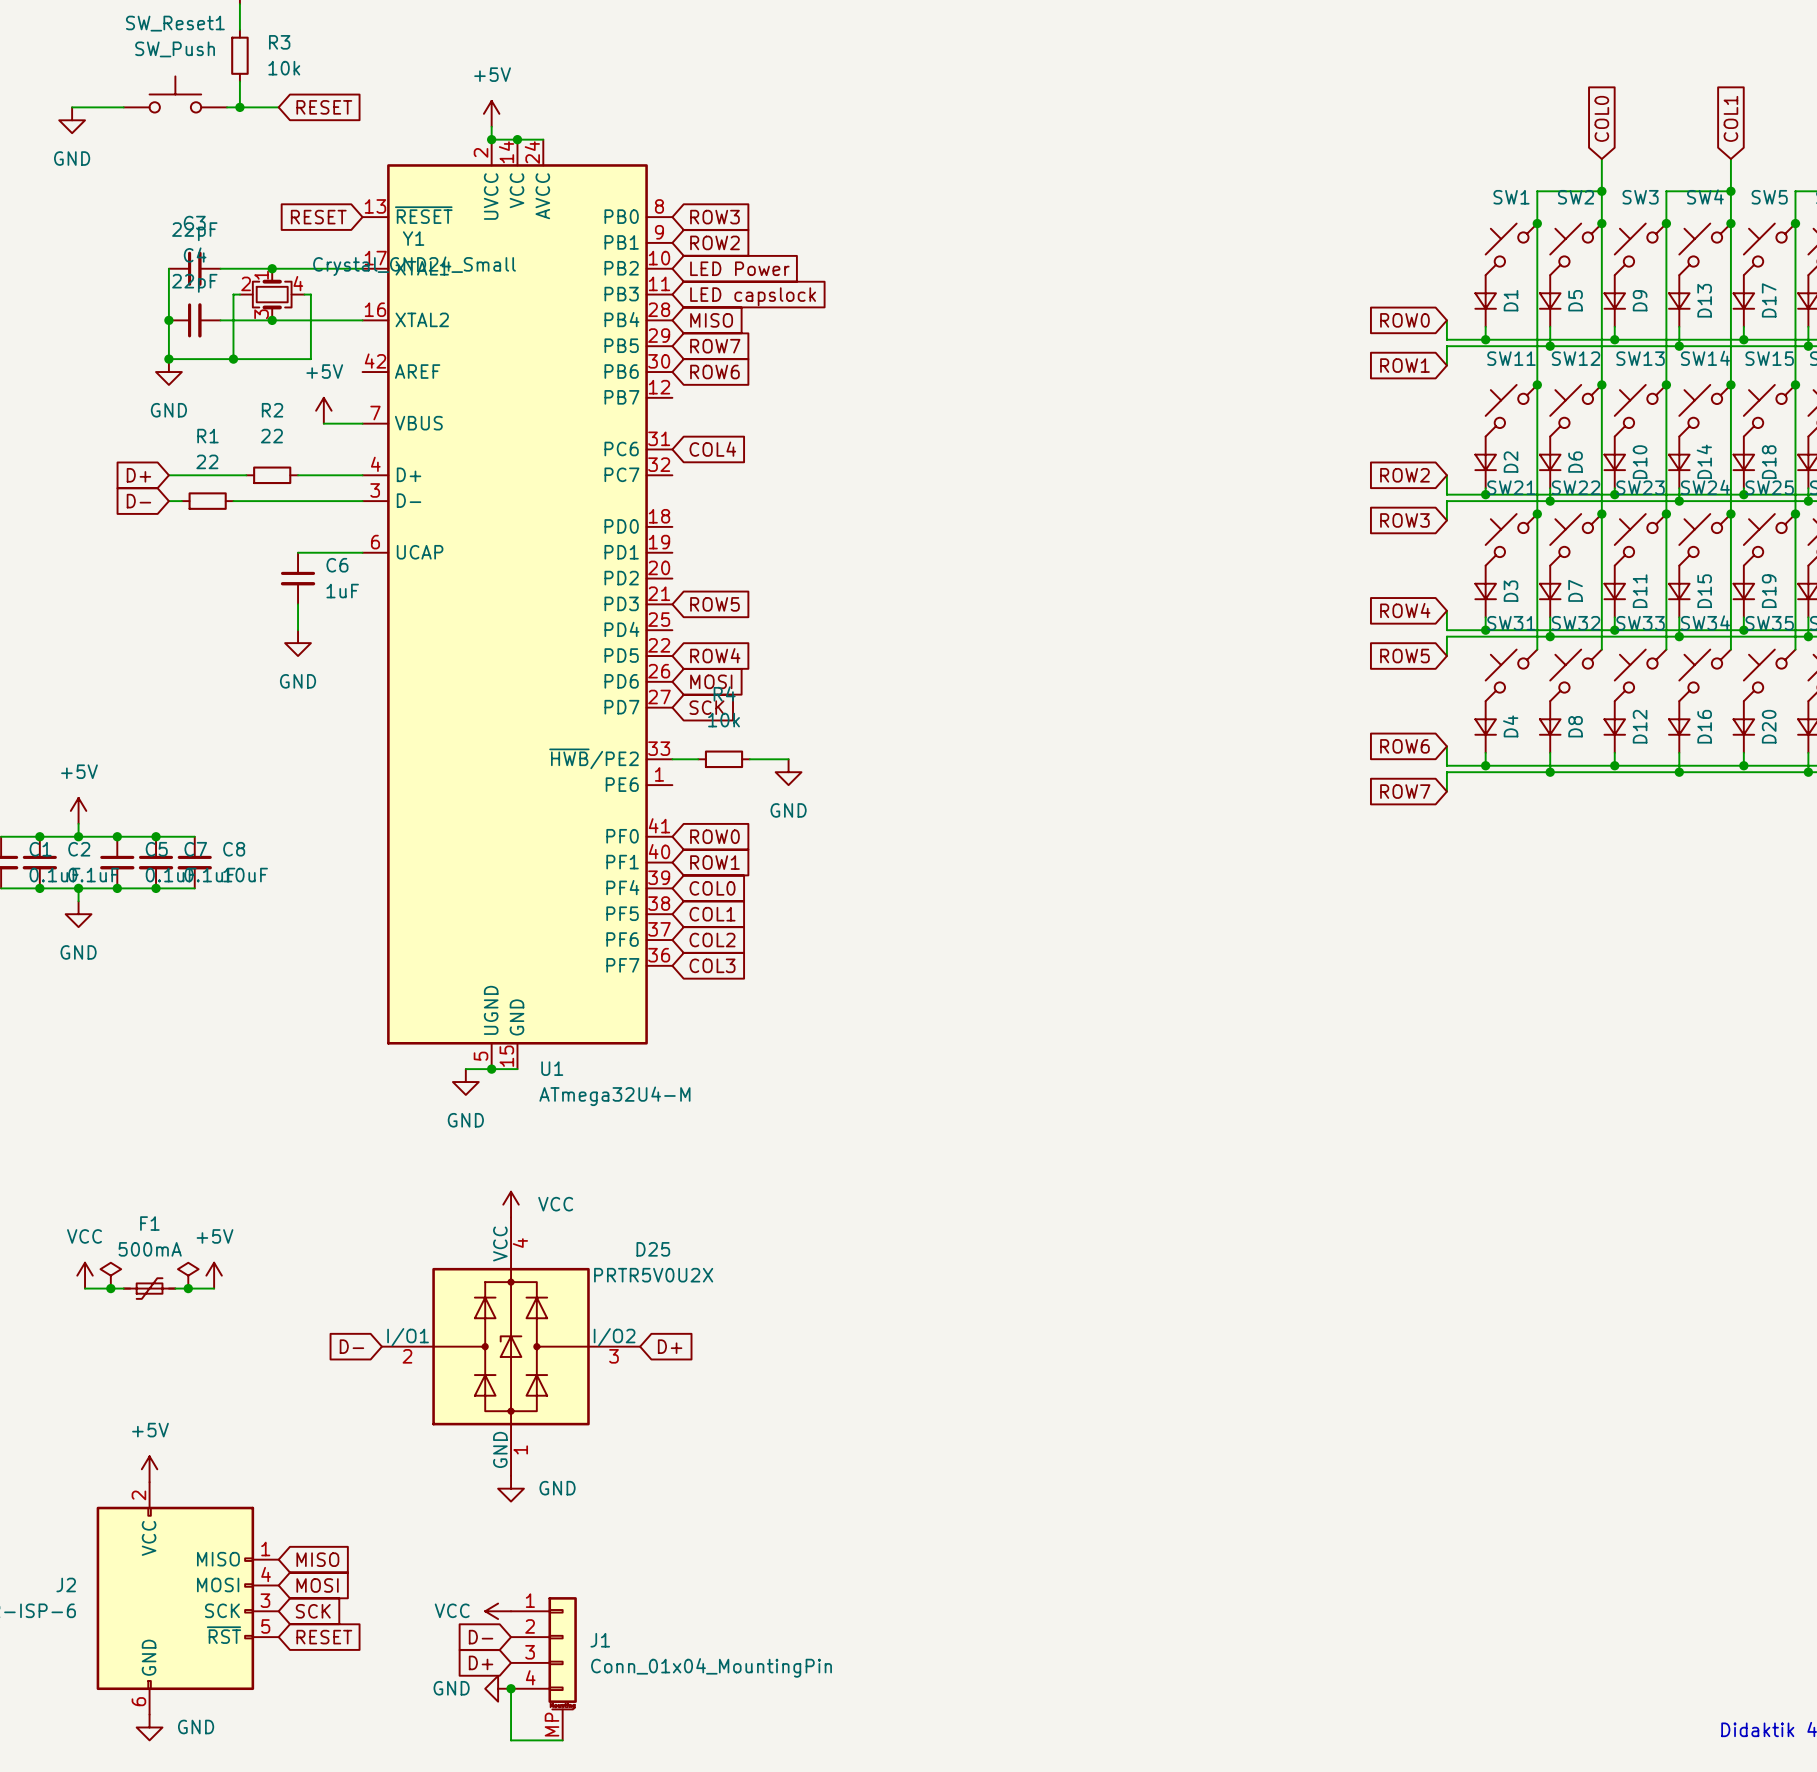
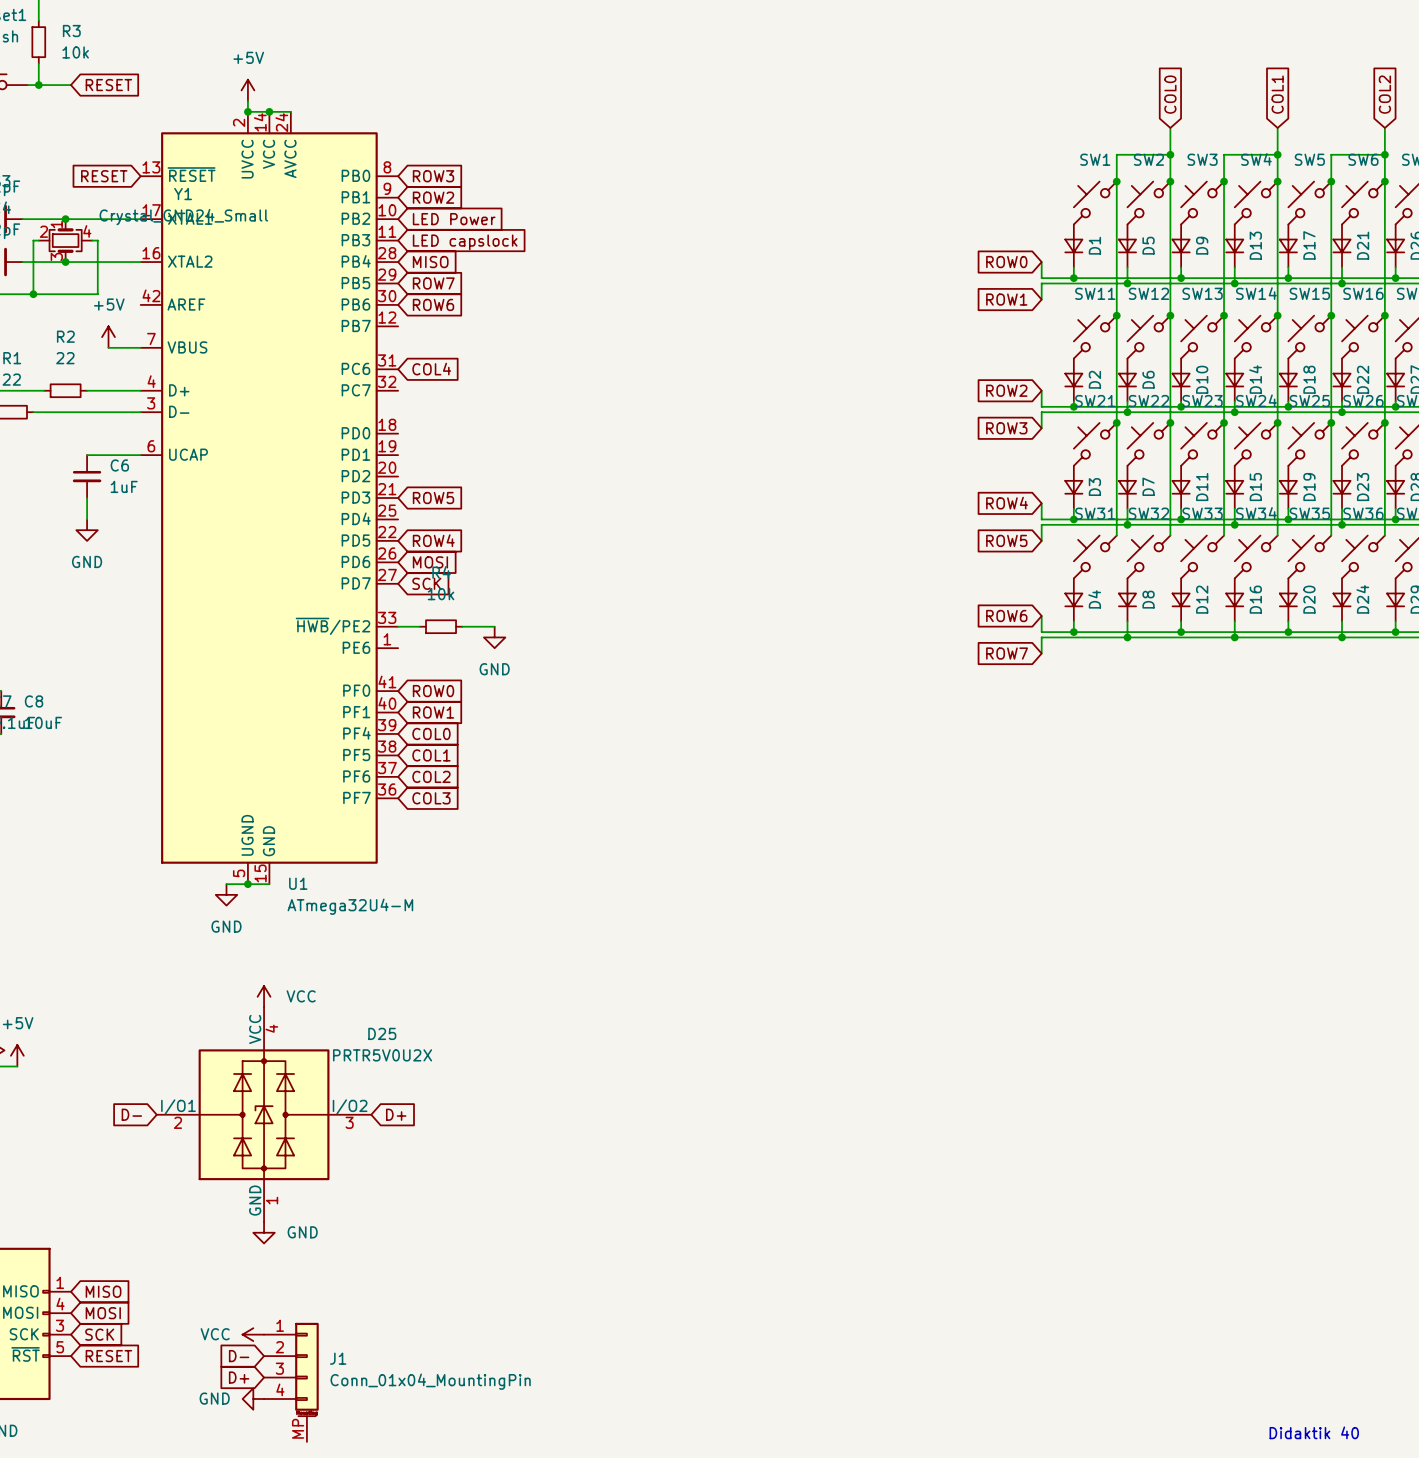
wire: (511, 1688) (511, 1740) (562, 1740) -> none
junction: (511, 1688) -> none

